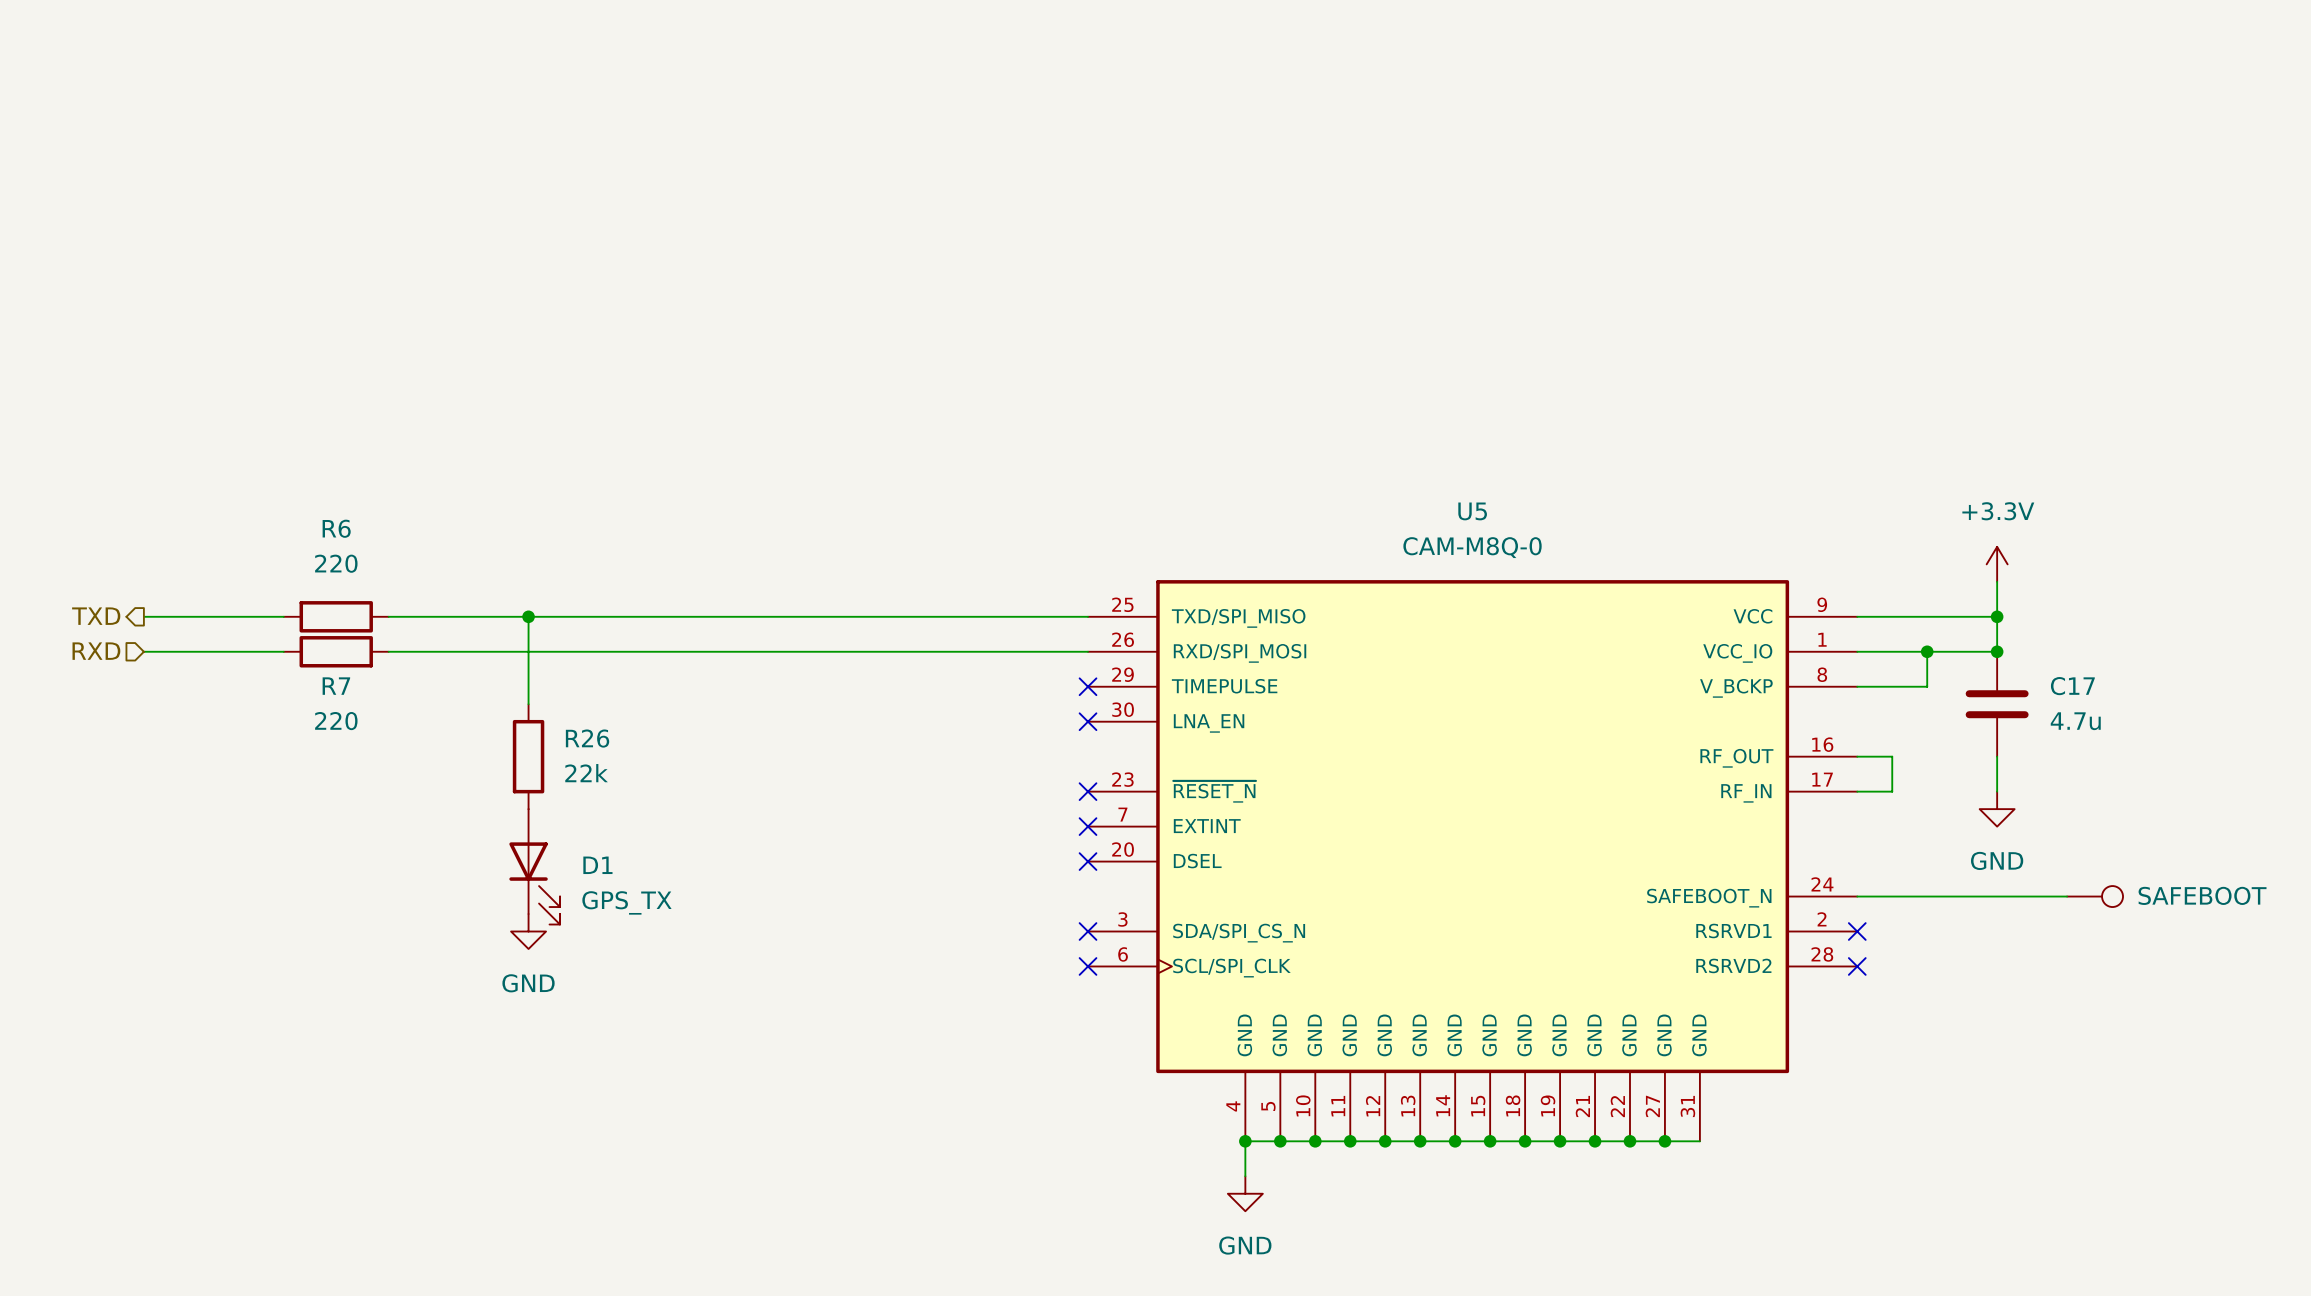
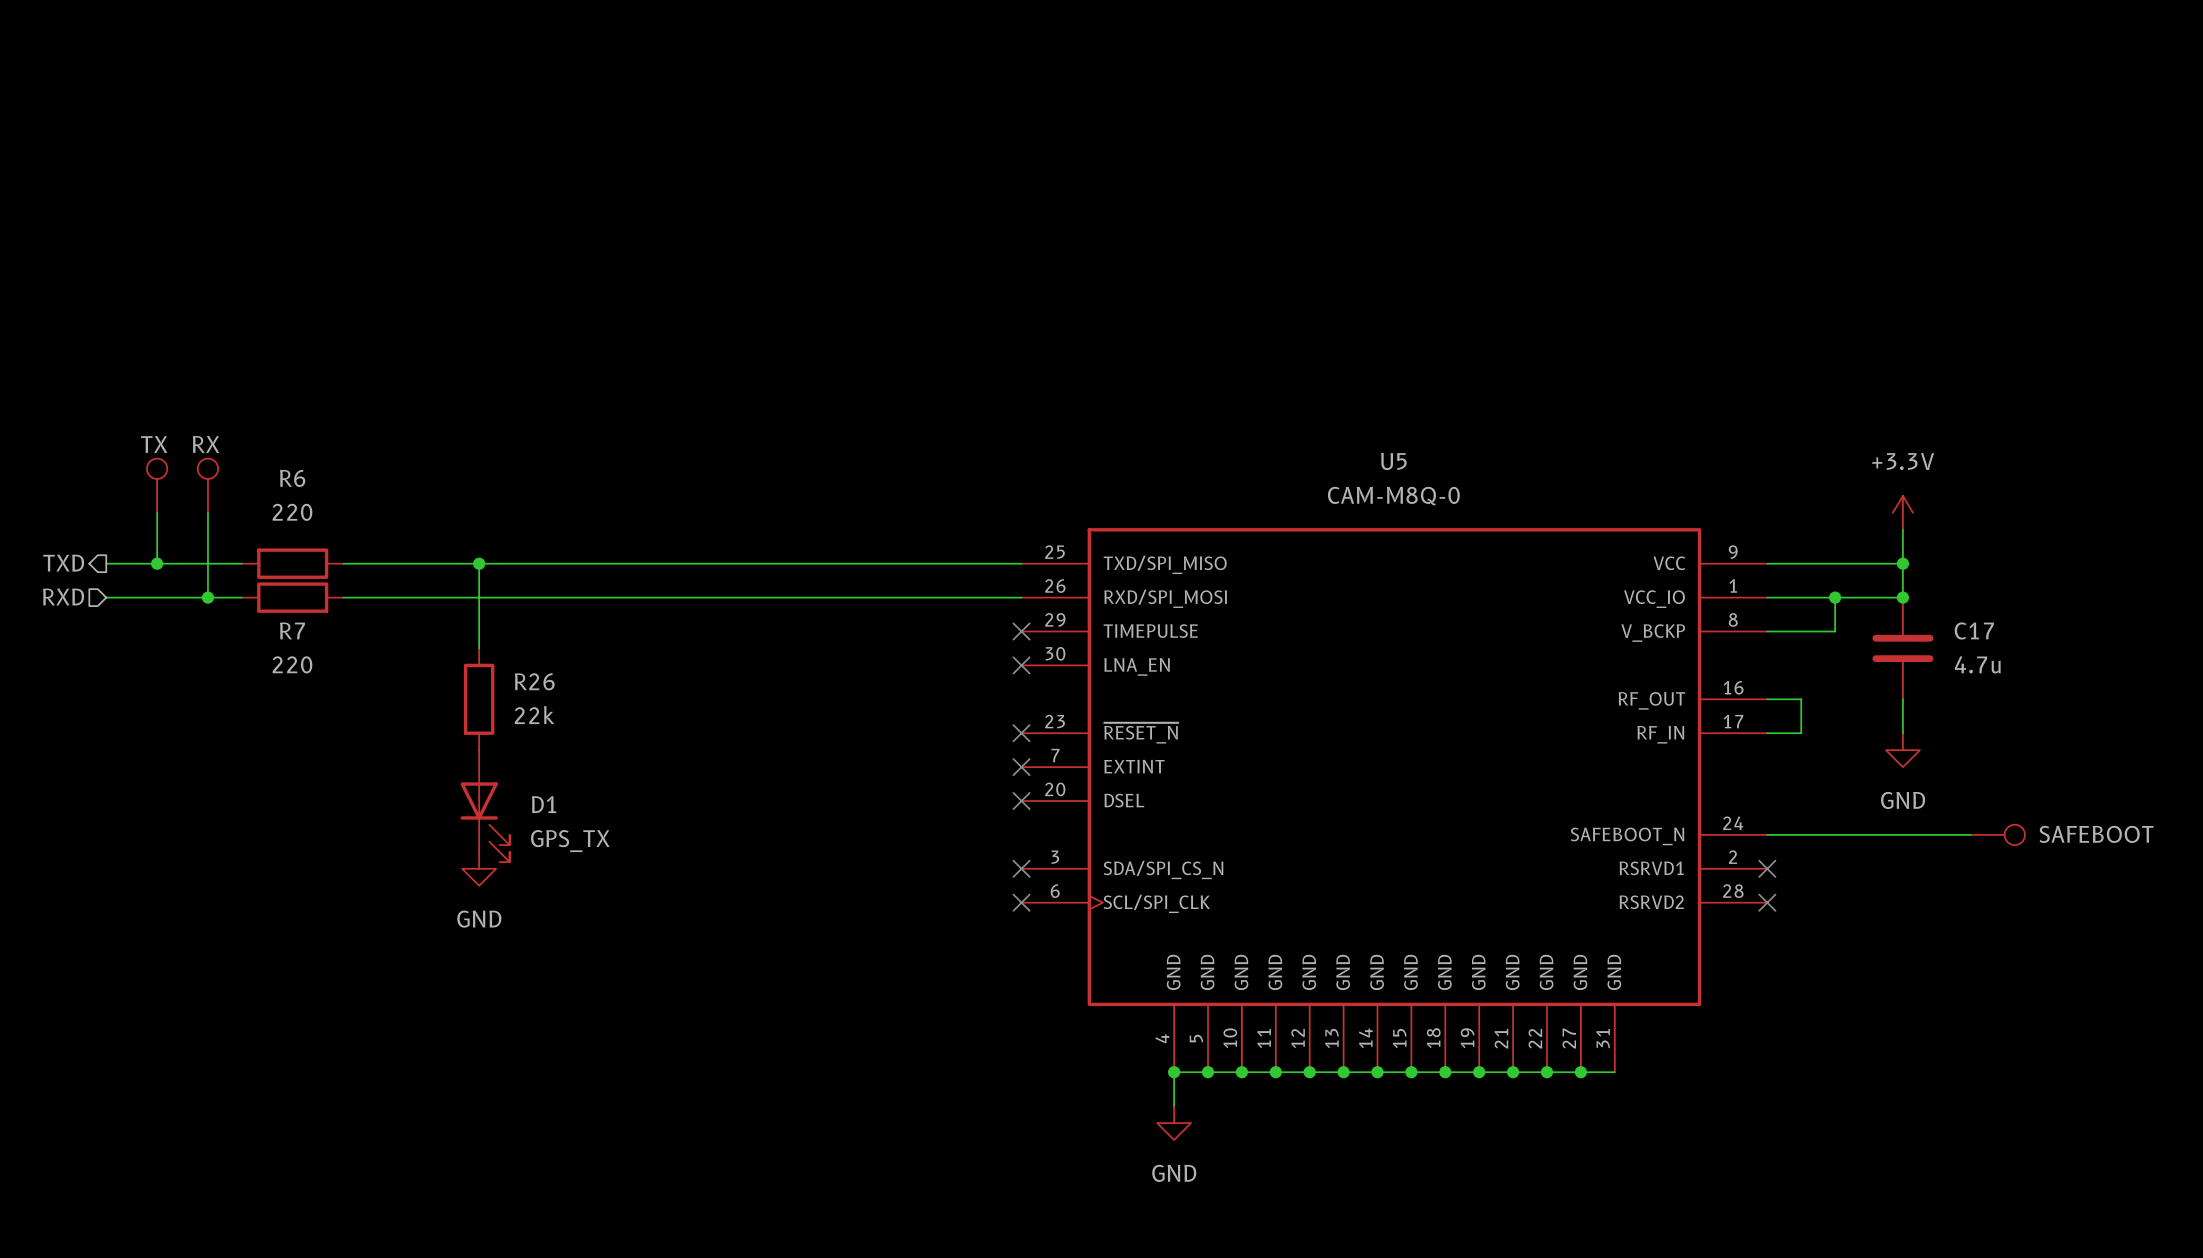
part: none -> TX (157, 485)
part: none -> RX (207, 485)
wire: none -> (157, 512) (157, 563)
wire: none -> (207, 512) (207, 597)
junction: none -> (157, 563)
junction: none -> (207, 597)

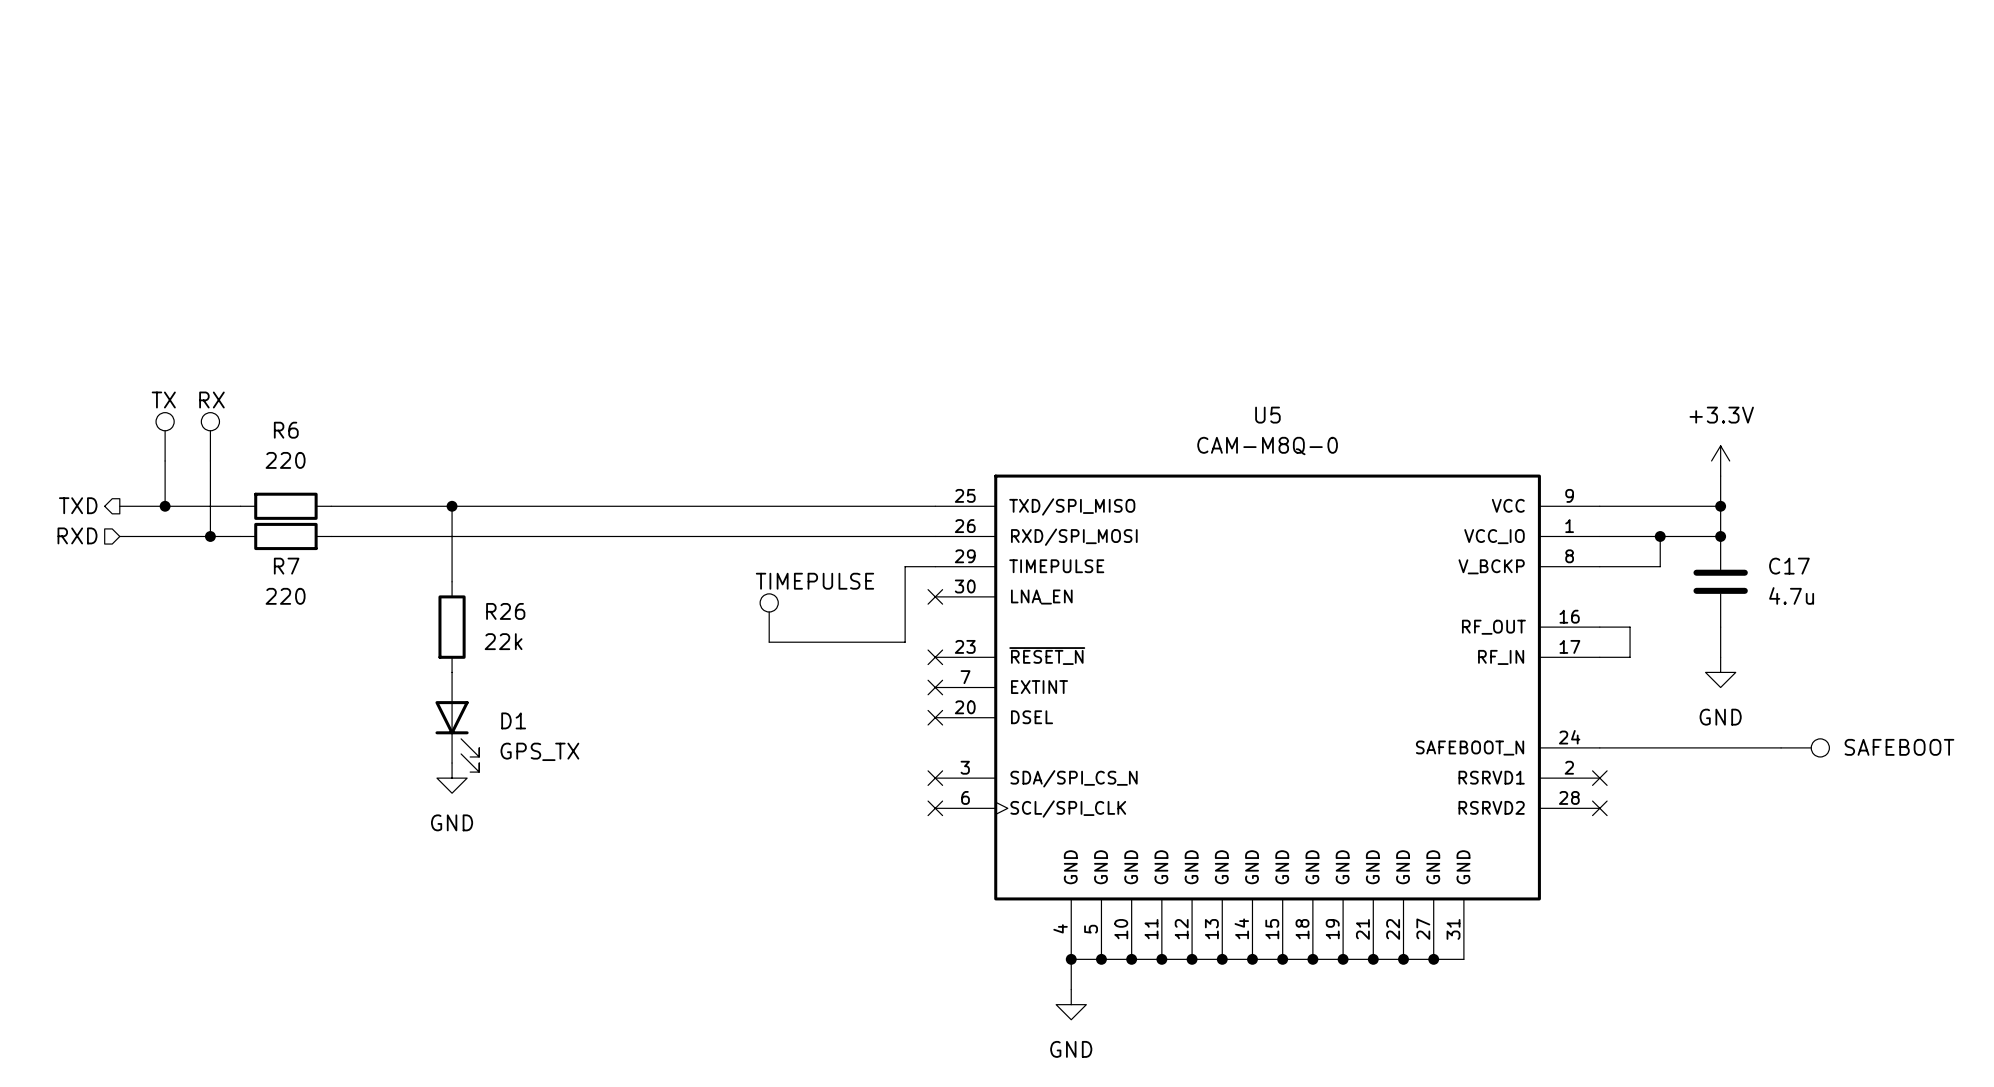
wire: none -> (935, 566) (905, 566) (905, 642) (769, 642)
no-connect mark: (1021, 631) -> none
part: none -> TIMEPULSE (769, 618)

